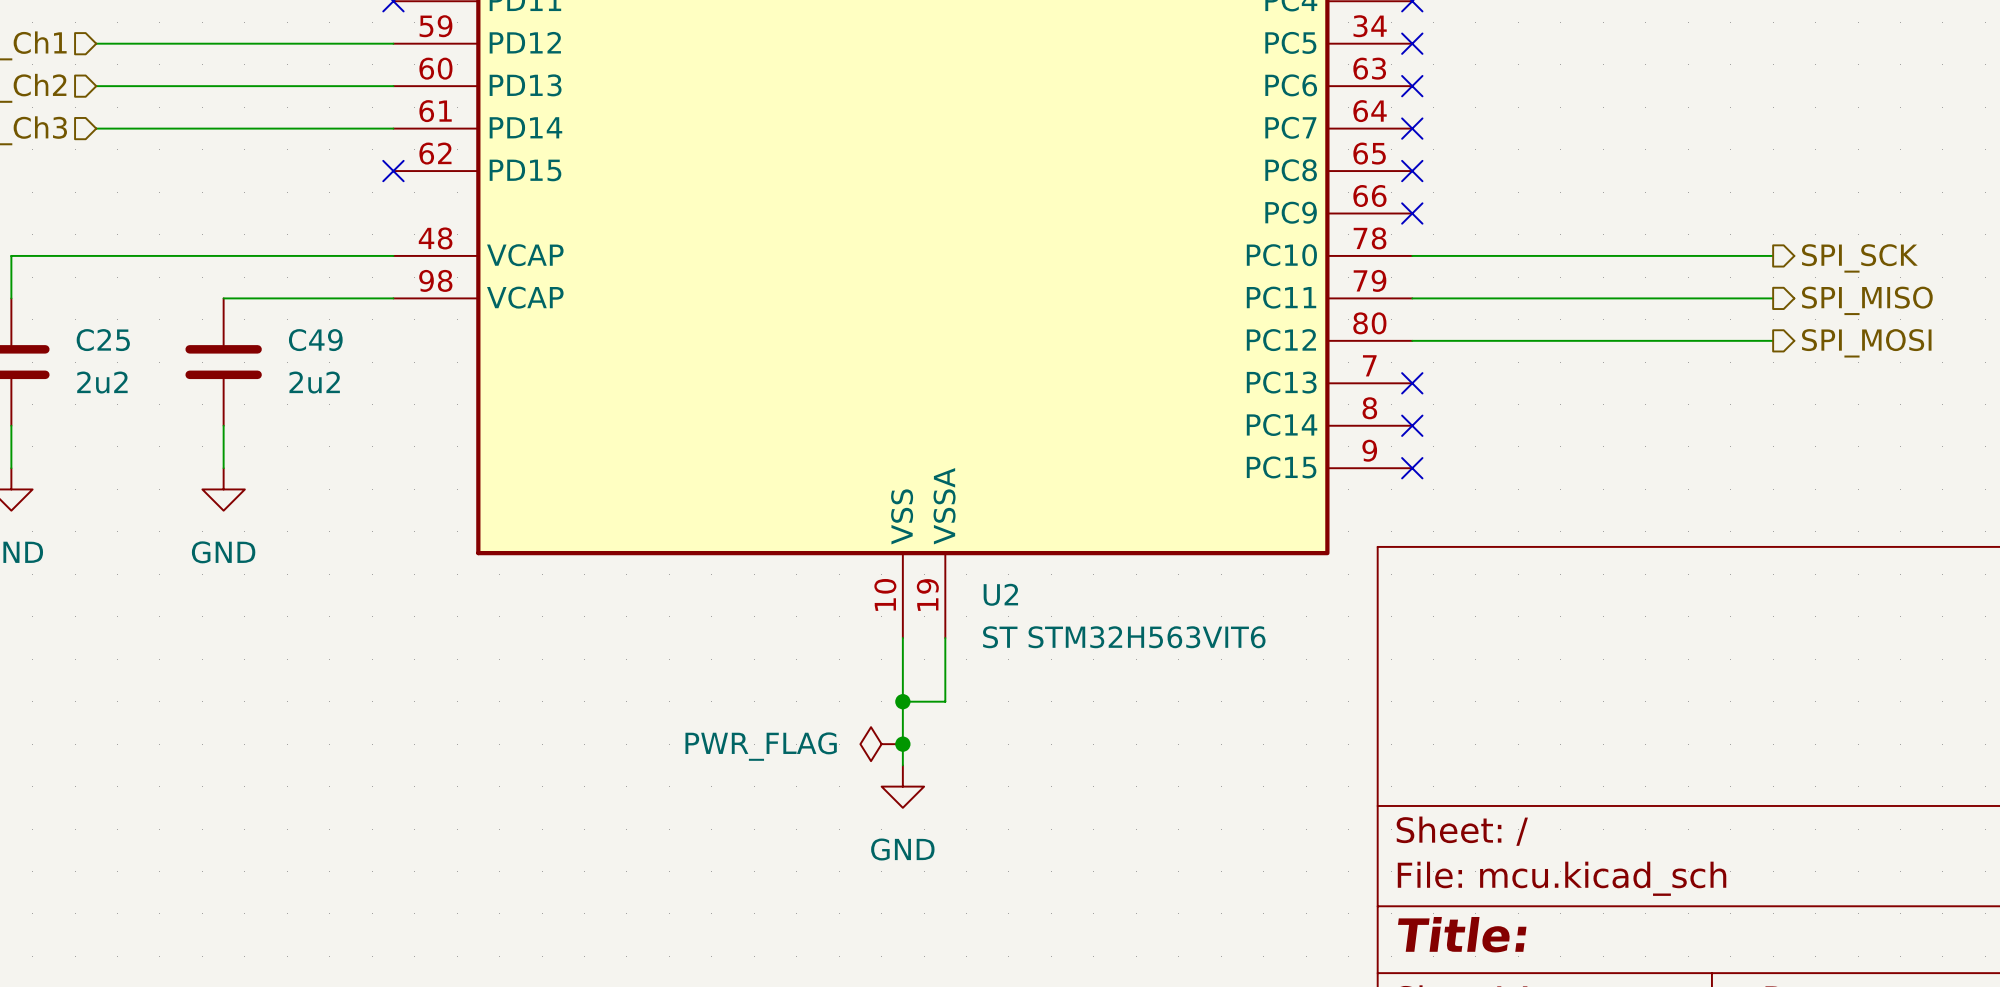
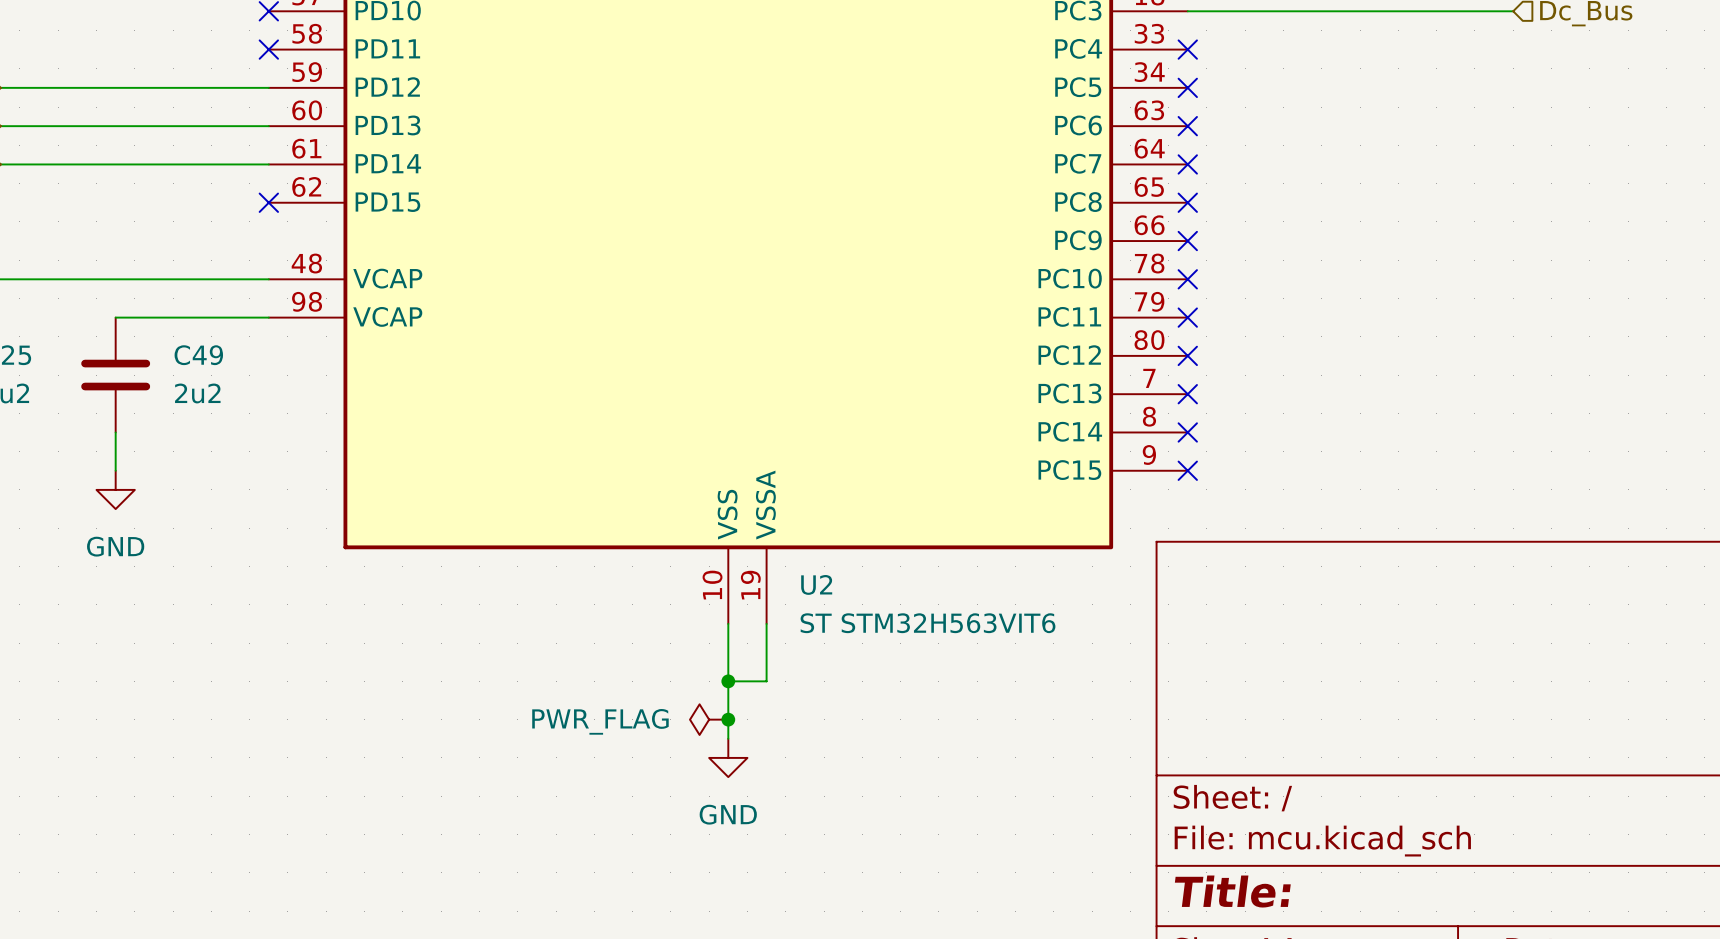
wire: (1412, 255) (1773, 255) -> none
no-connect mark: none -> (1187, 279)
hierarchical label: SPI_SCK (1859, 258) -> none
wire: (1412, 298) (1773, 298) -> none
no-connect mark: none -> (1187, 317)
hierarchical label: SPI_MISO (1867, 300) -> none
wire: (1412, 340) (1773, 340) -> none
no-connect mark: none -> (1187, 355)
hierarchical label: SPI_MOSI (1866, 343) -> none

